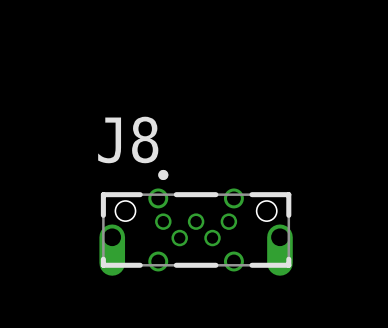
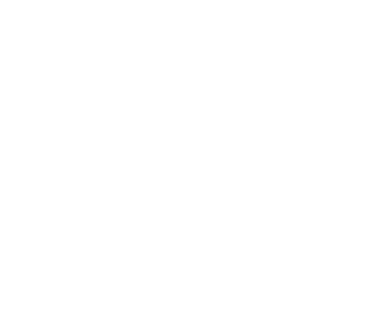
J8: (196, 222) -> none

